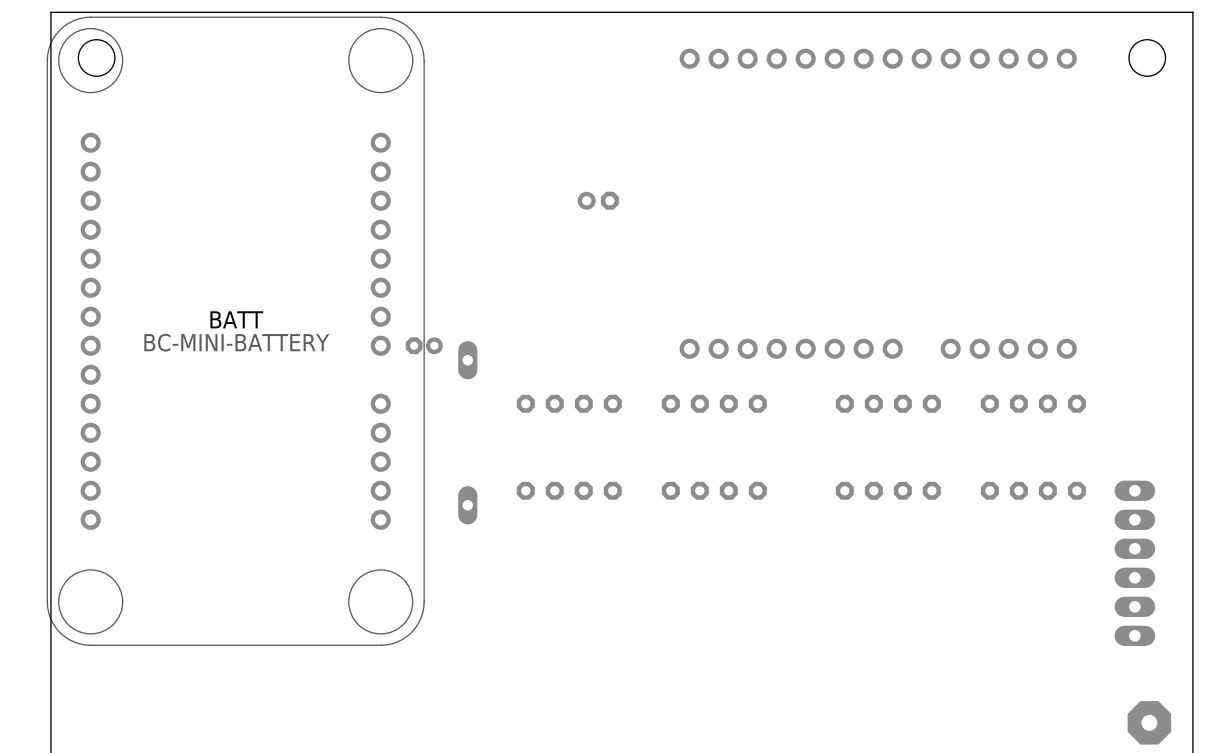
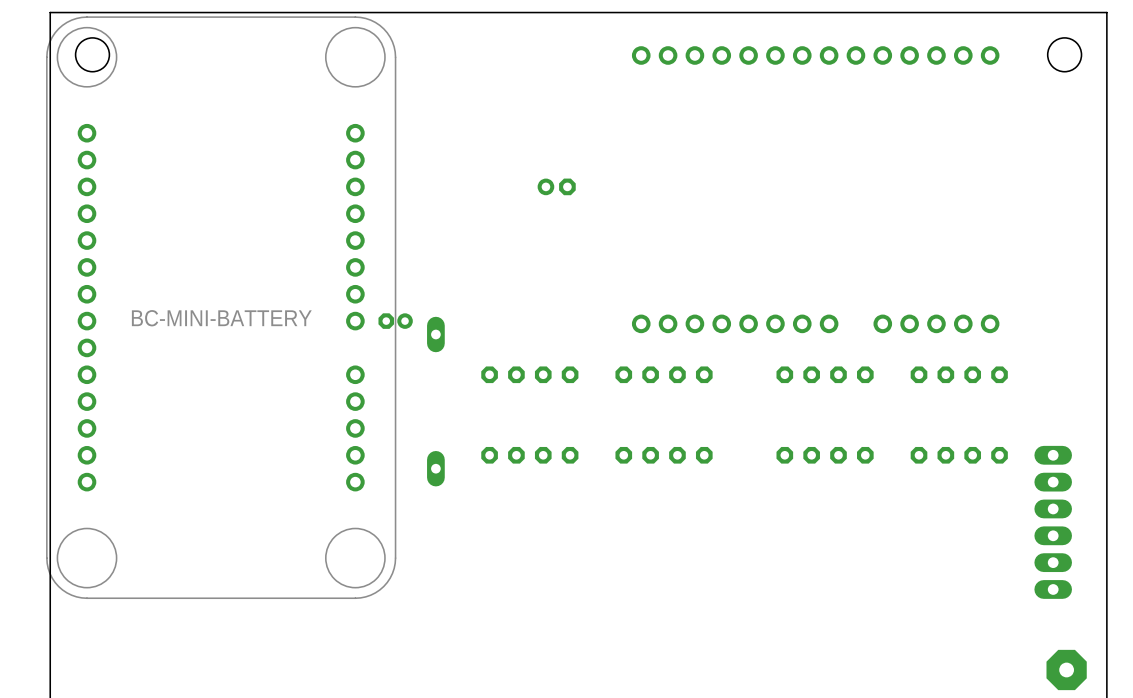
BATT name: BATT (236, 319) -> none

